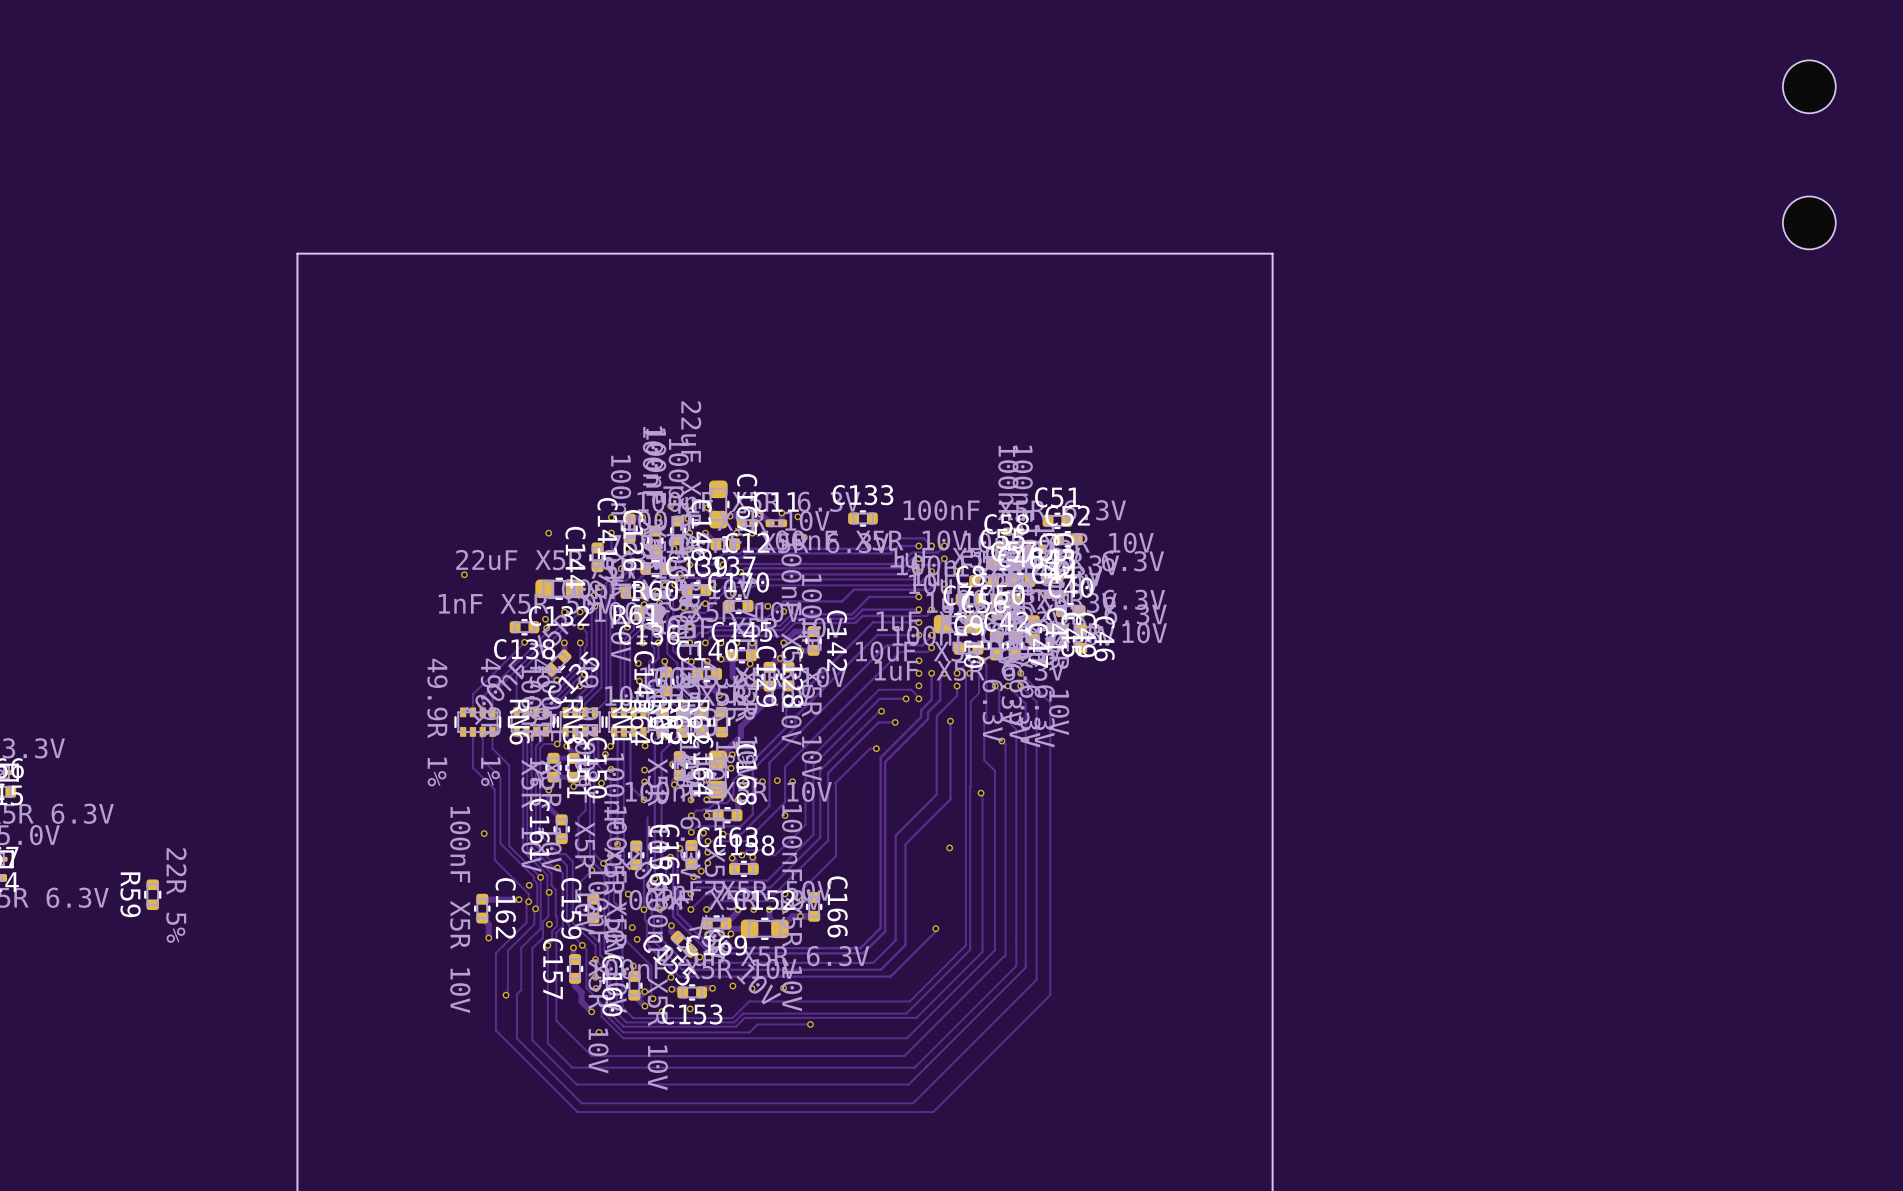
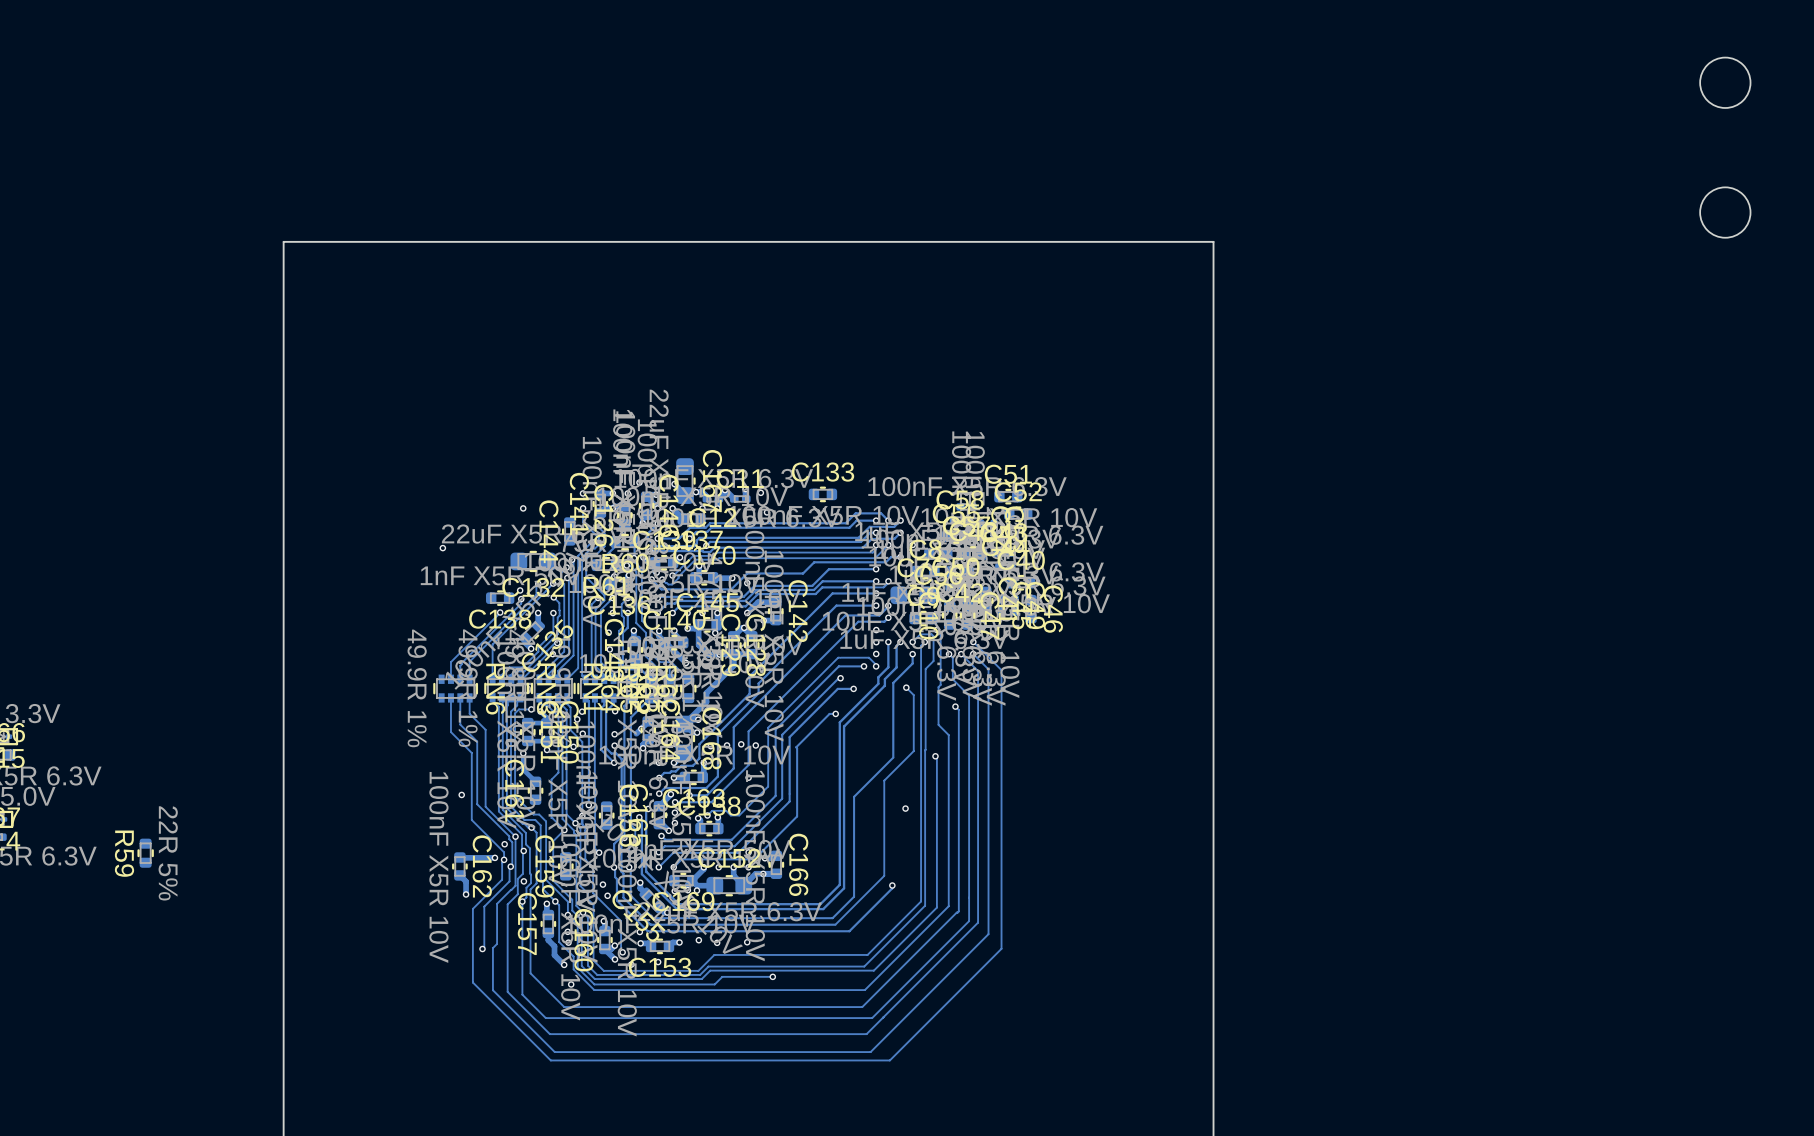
track: (950, 721) (950, 799) (905, 844) (905, 945) (880, 969) (876, 969) -> (906, 687) (913, 695) (913, 751) (884, 780) (884, 875) (835, 924)
track: none -> (641, 728) (636, 733)
track: (647, 817) (647, 872) (643, 875) (643, 885) -> (613, 697) (613, 703) (606, 711) (606, 748) (621, 759) (621, 836) (614, 844)

